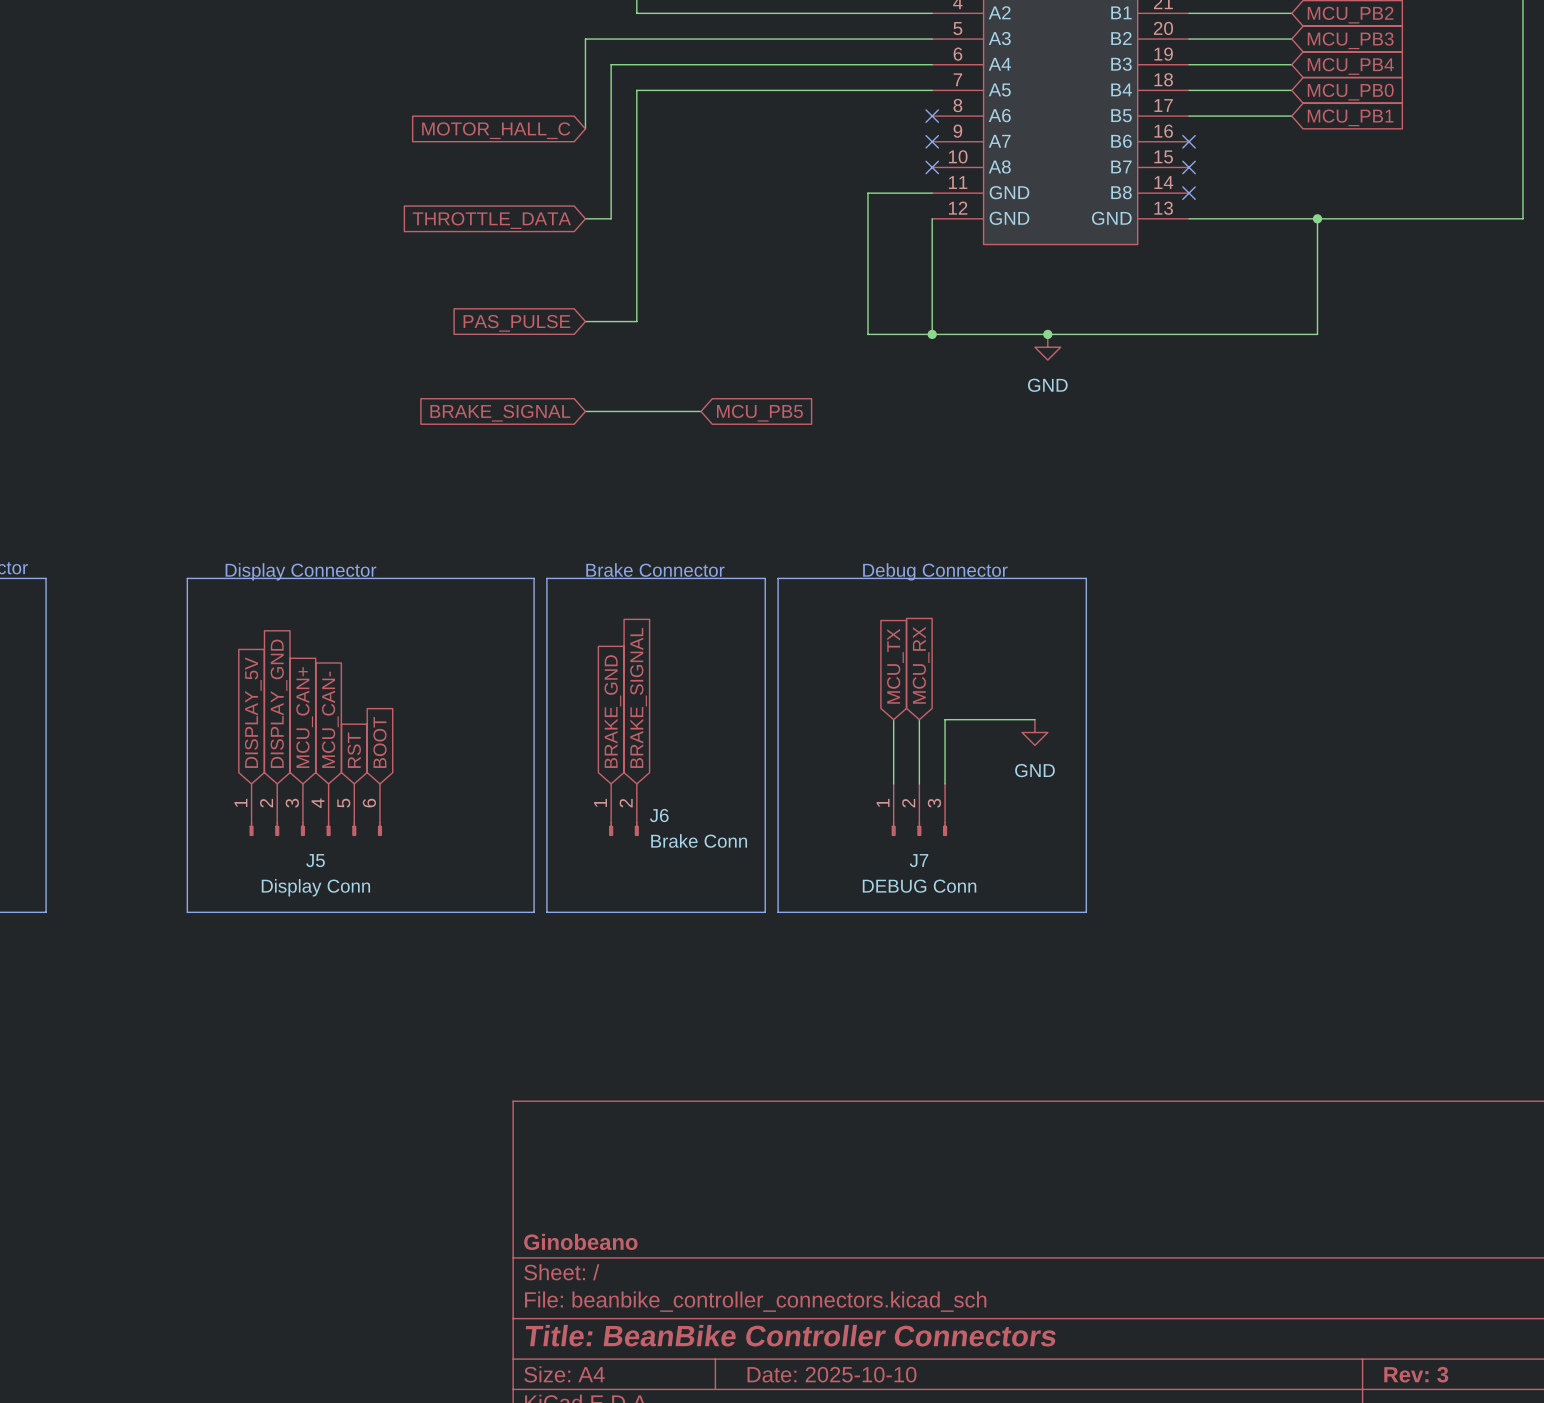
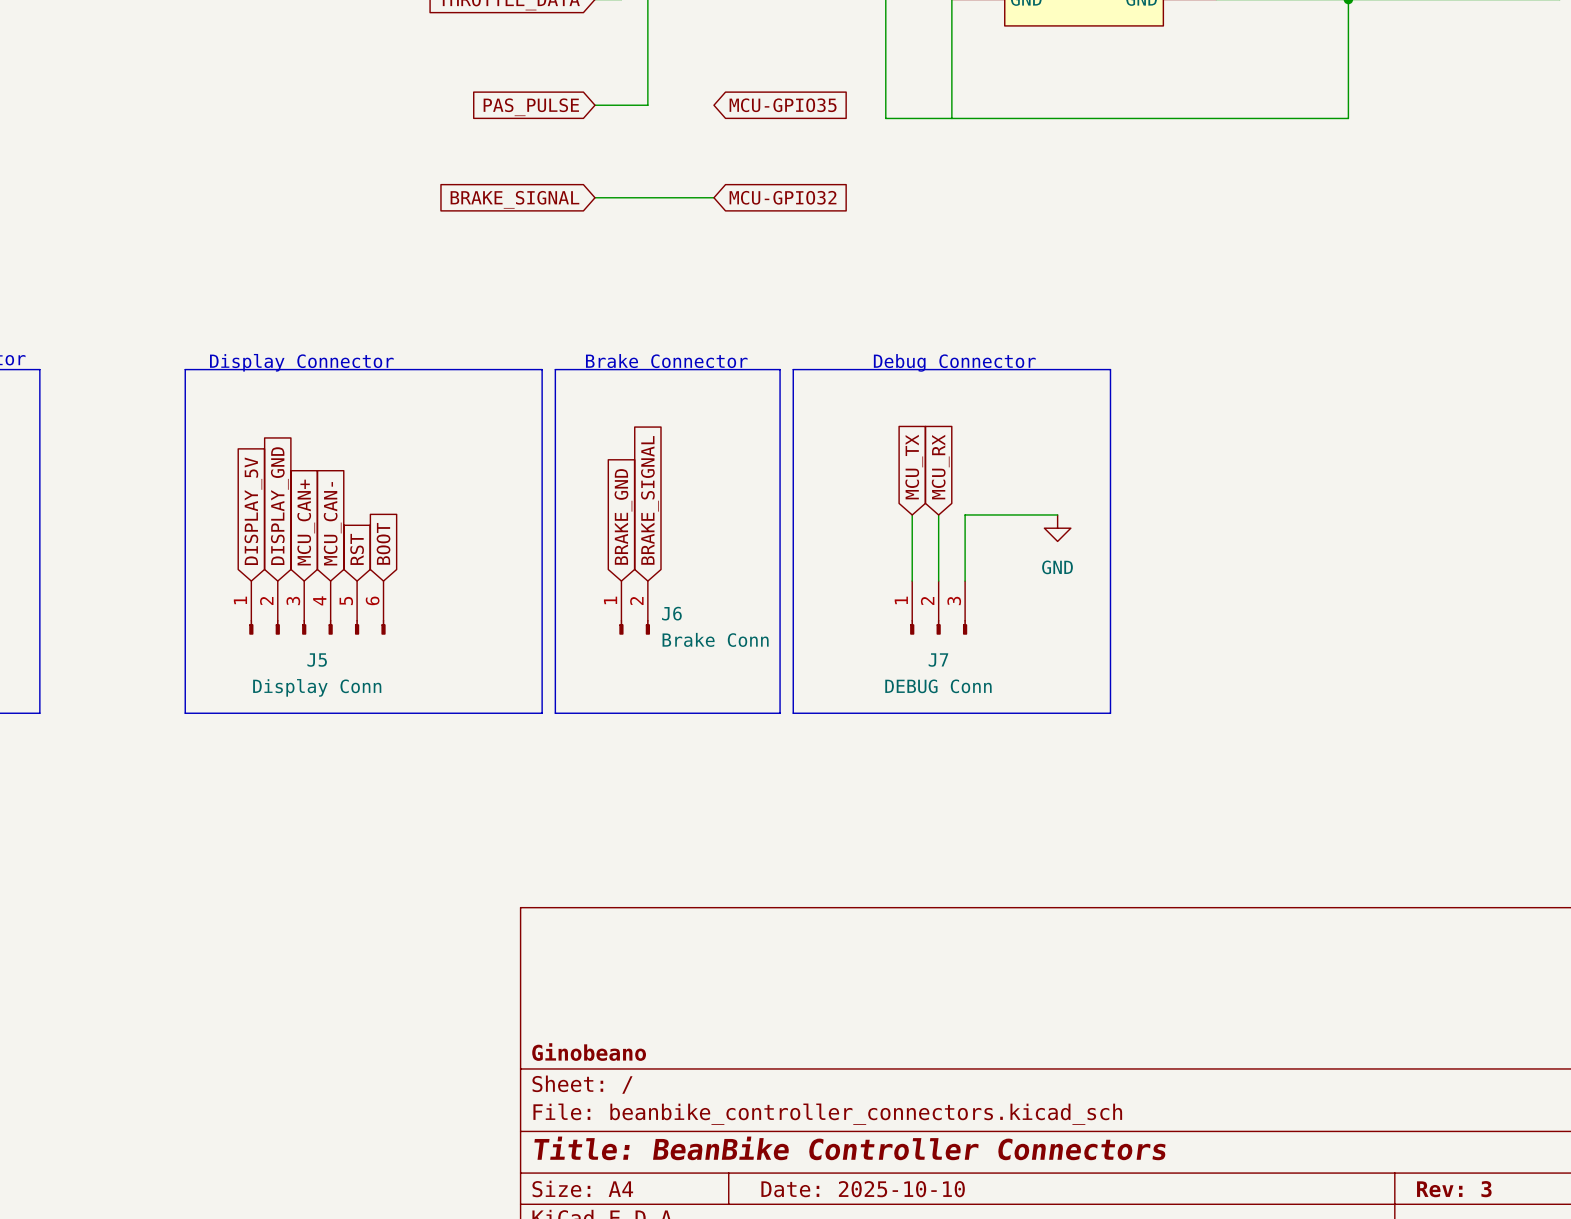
global label: none -> MCU-GPIO35 (783, 105)
junction: (932, 334) -> none
junction: (1047, 334) -> none
power symbol: GND (1047, 347) -> none
global label: MCU_PB5 (759, 413) -> MCU-GPIO32 (783, 197)

